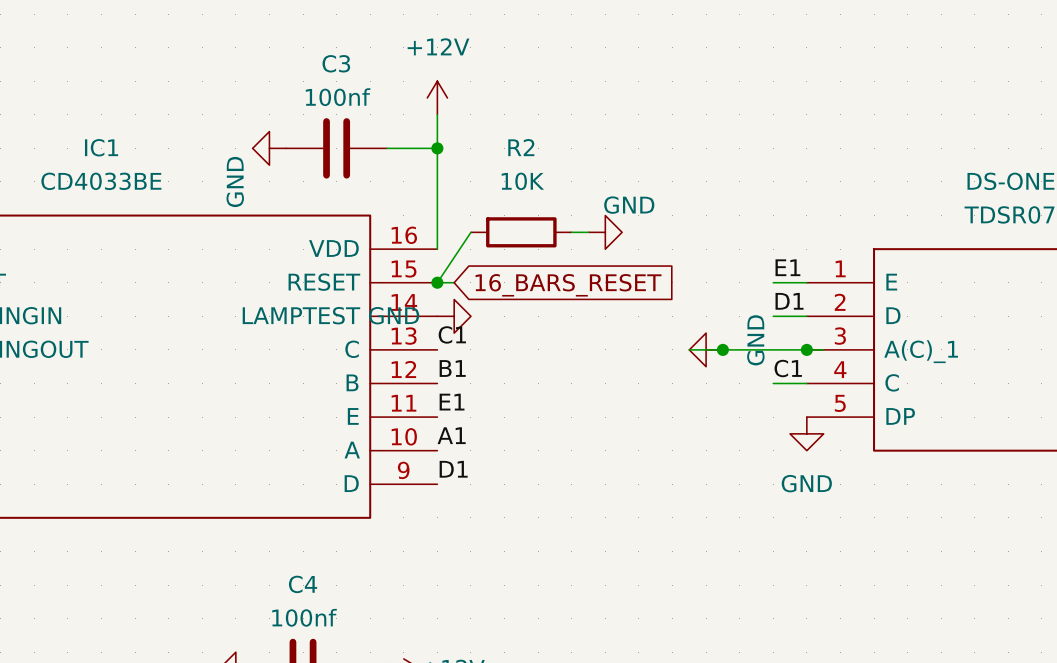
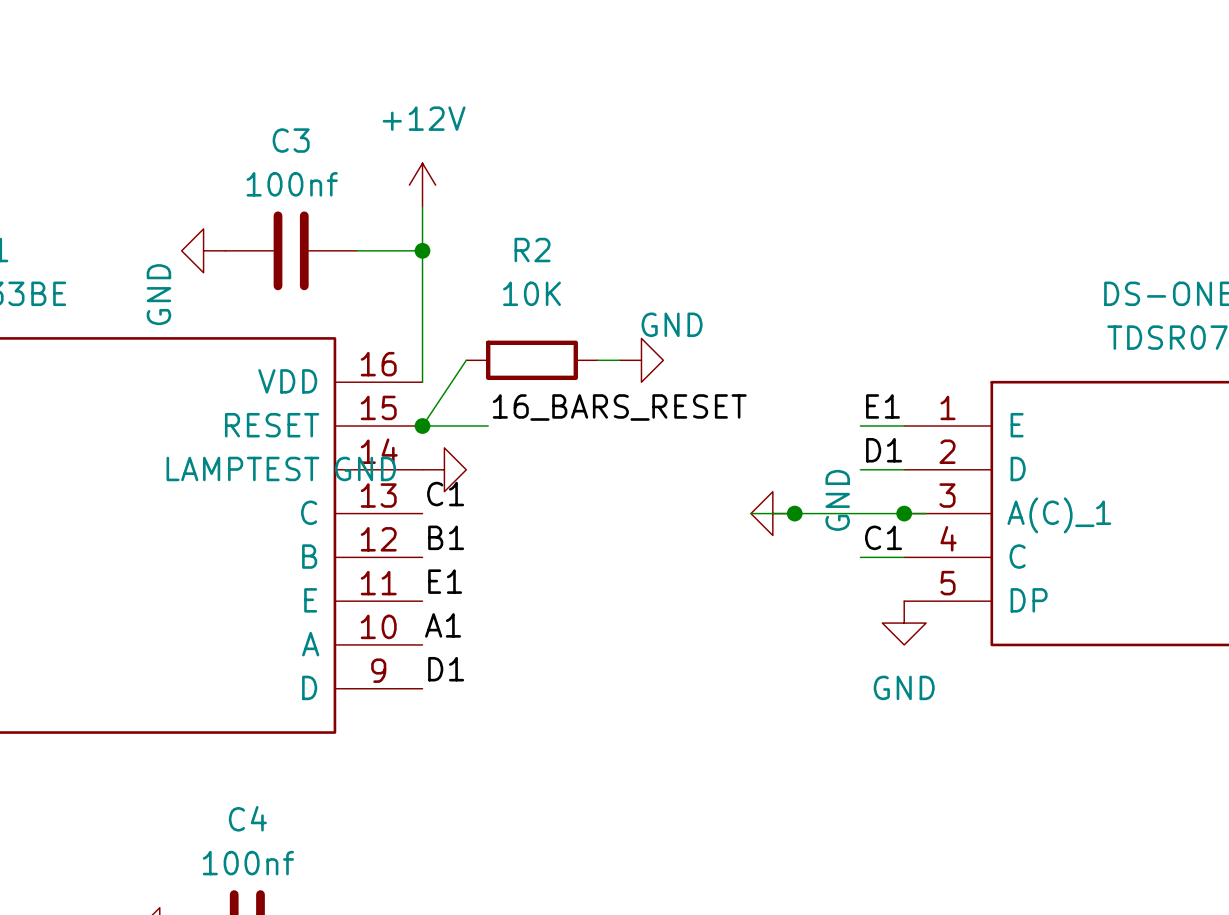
label: none -> 16_BARS_RESET (619, 407)
wire: none -> (444, 426) (488, 426)
global label: 16_BARS_RESET (568, 285) -> none

